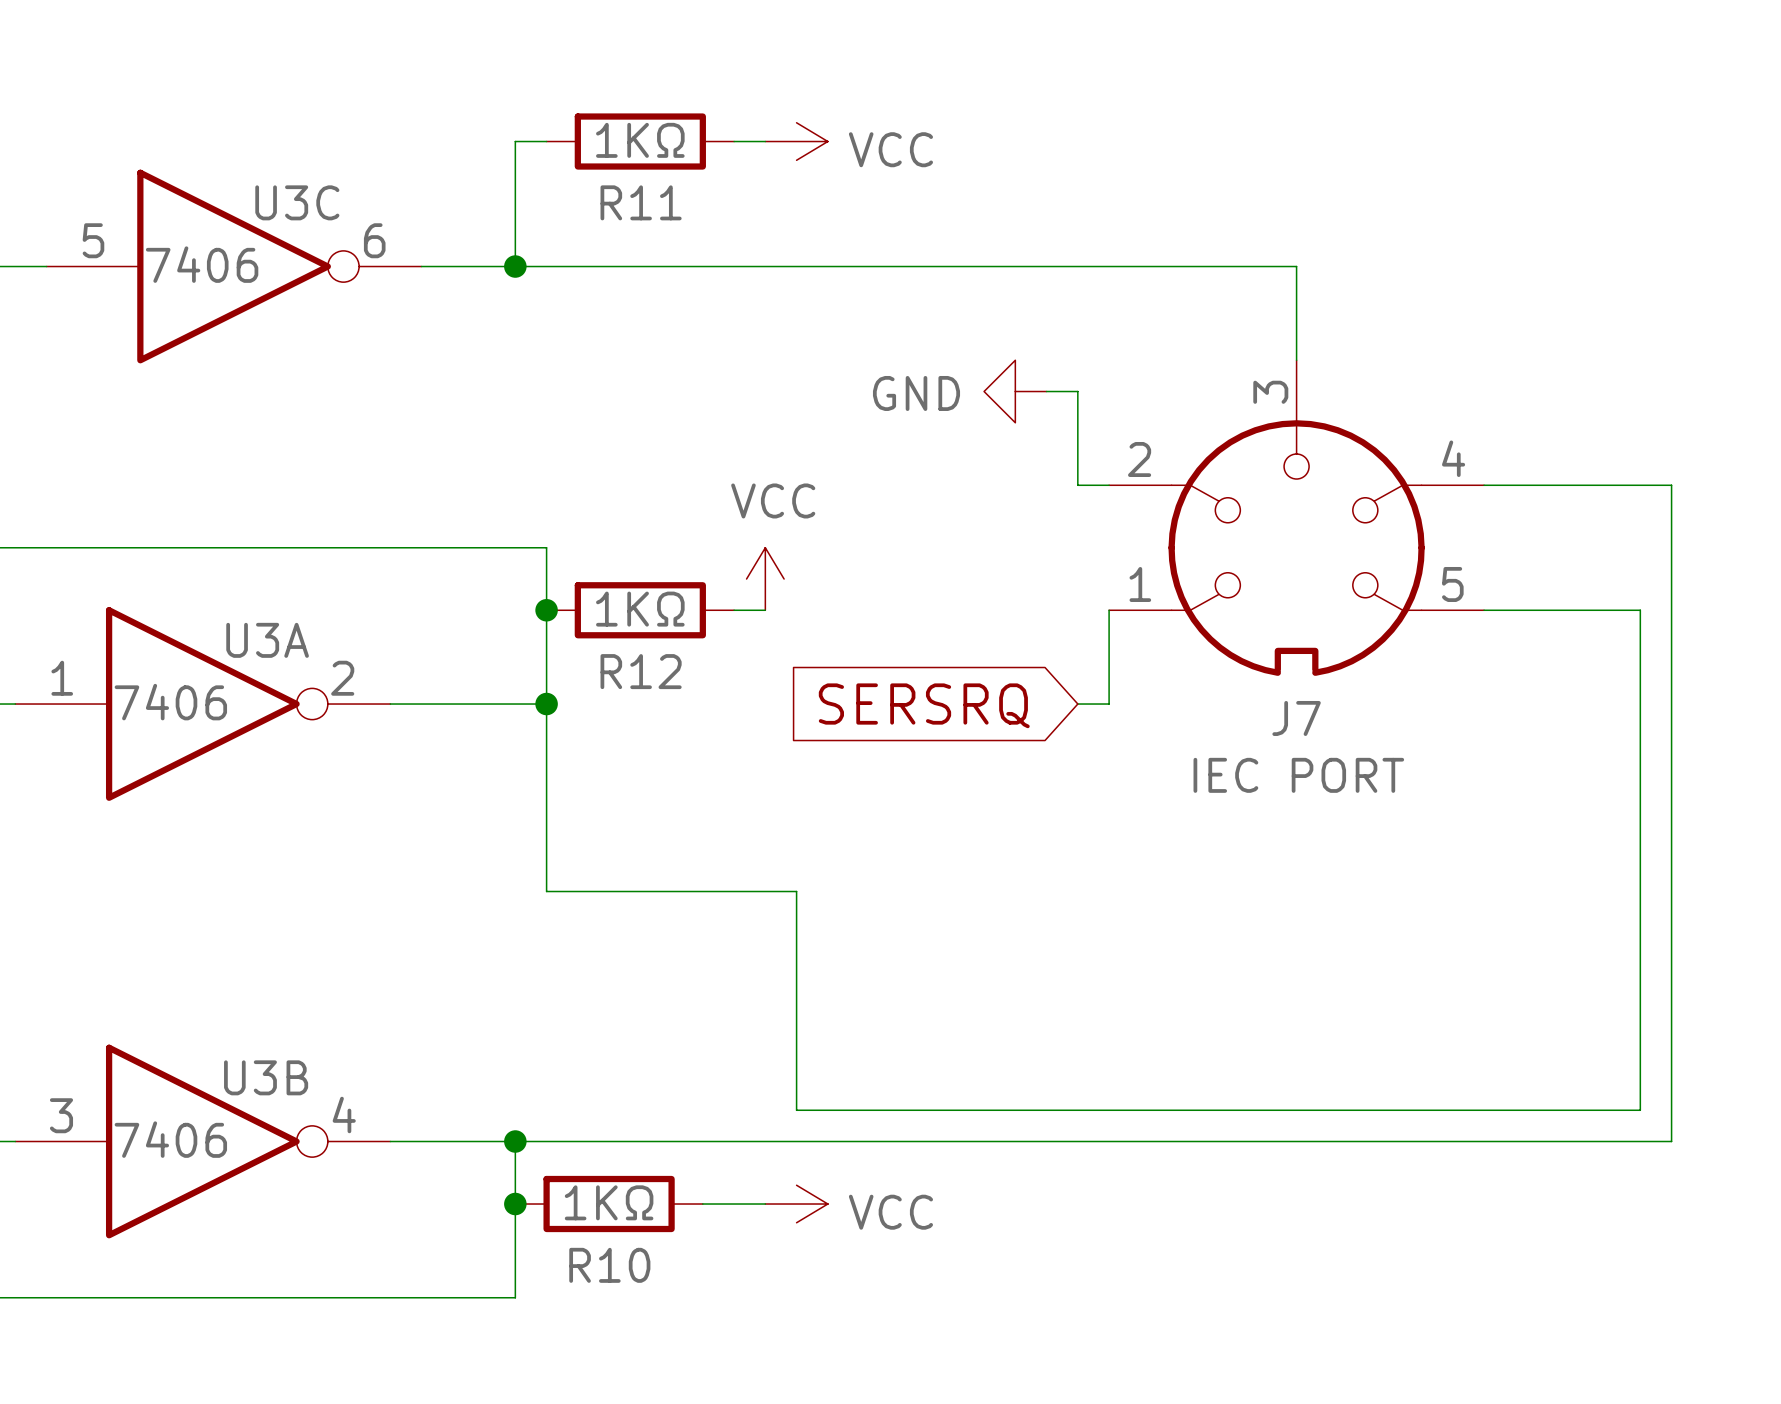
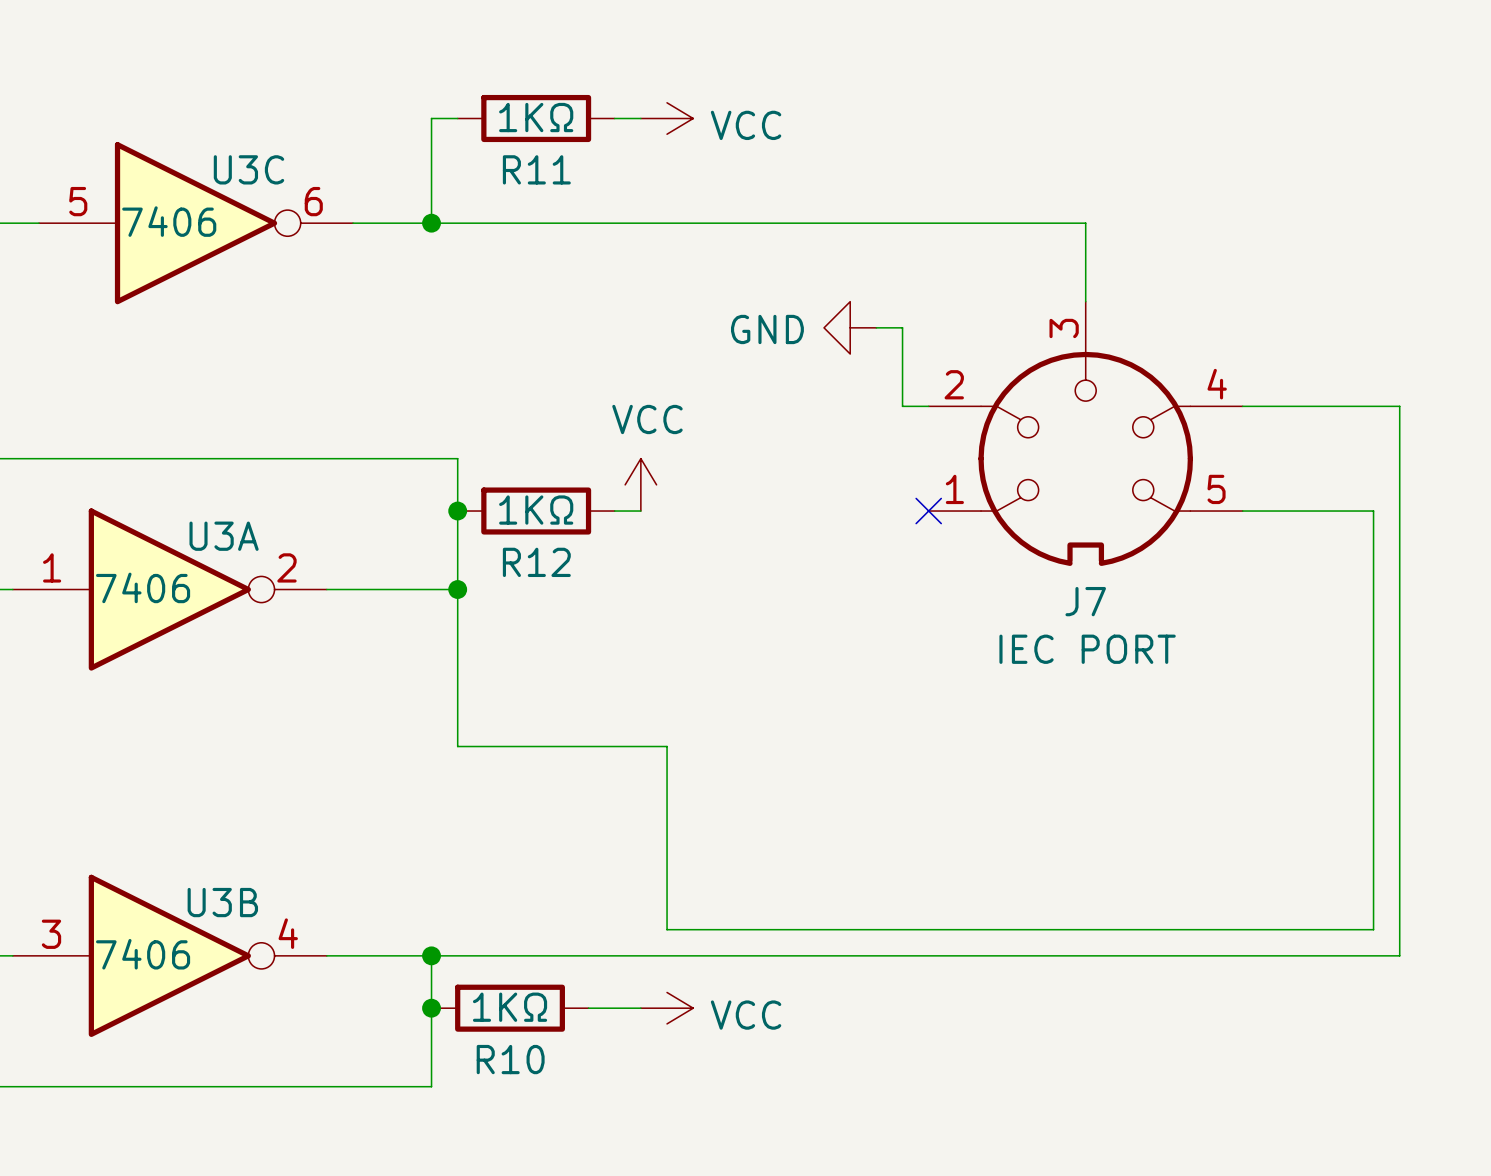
wire: (1109, 610) (1109, 704) (1077, 704) -> none
no-connect mark: none -> (928, 511)
global label: SERSRQ (924, 705) -> none

